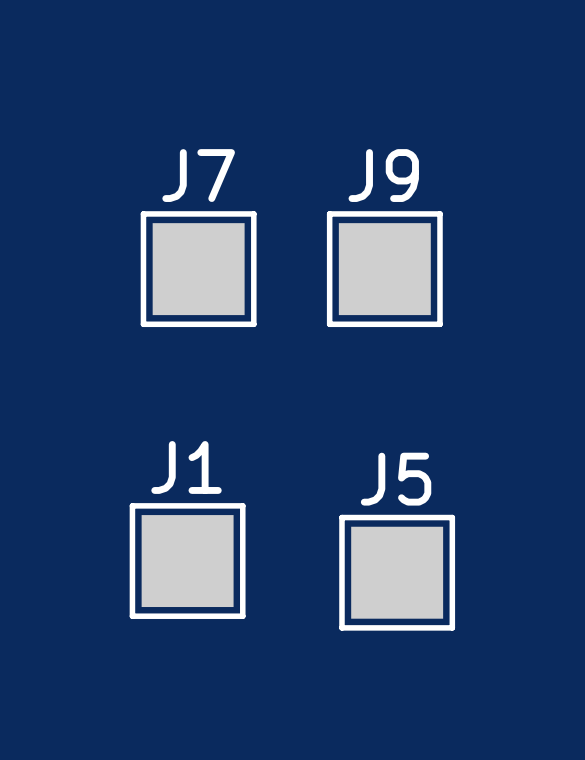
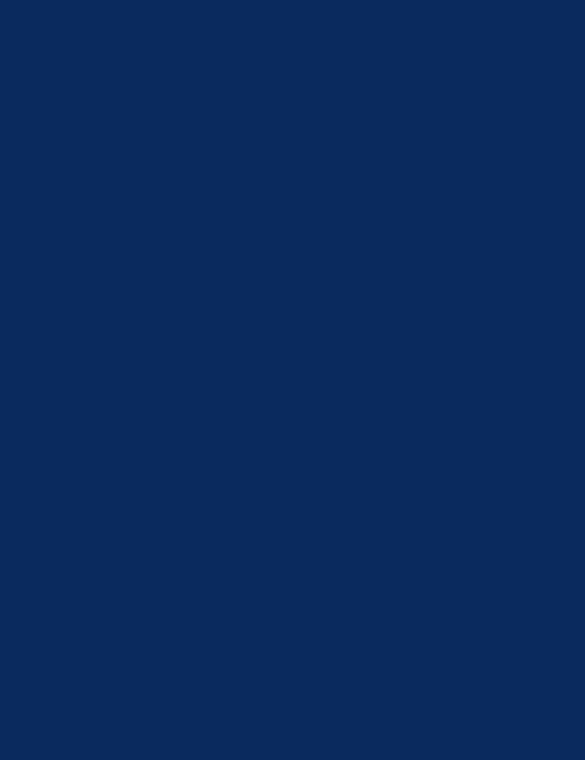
J7: (198, 269) -> none
J9: (384, 269) -> none
J1: (187, 561) -> none
J5: (397, 572) -> none

